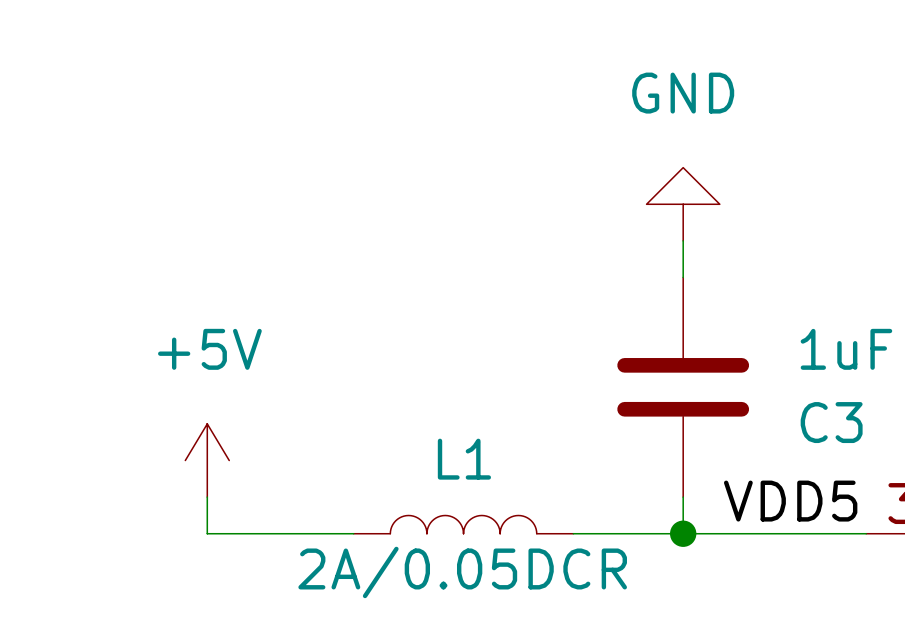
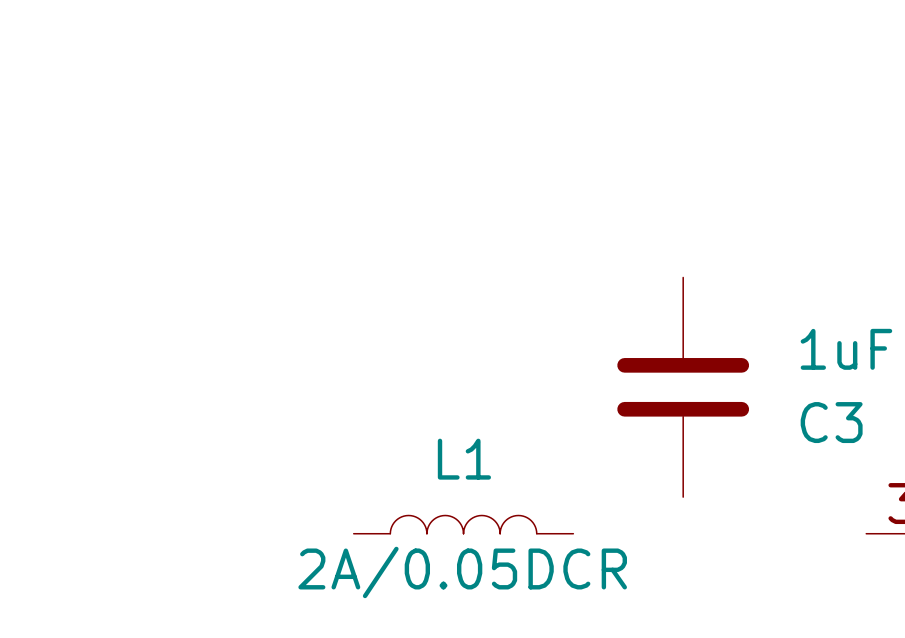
power symbol: GND (683, 204) -> none
wire: (683, 240) (683, 277) -> none
power symbol: +5V (207, 460) -> none
wire: (207, 497) (207, 533) (353, 533) -> none
wire: (683, 497) (683, 533) -> none
label: VDD5 (790, 501) -> none
wire: (573, 533) (866, 533) -> none
junction: (683, 533) -> none

